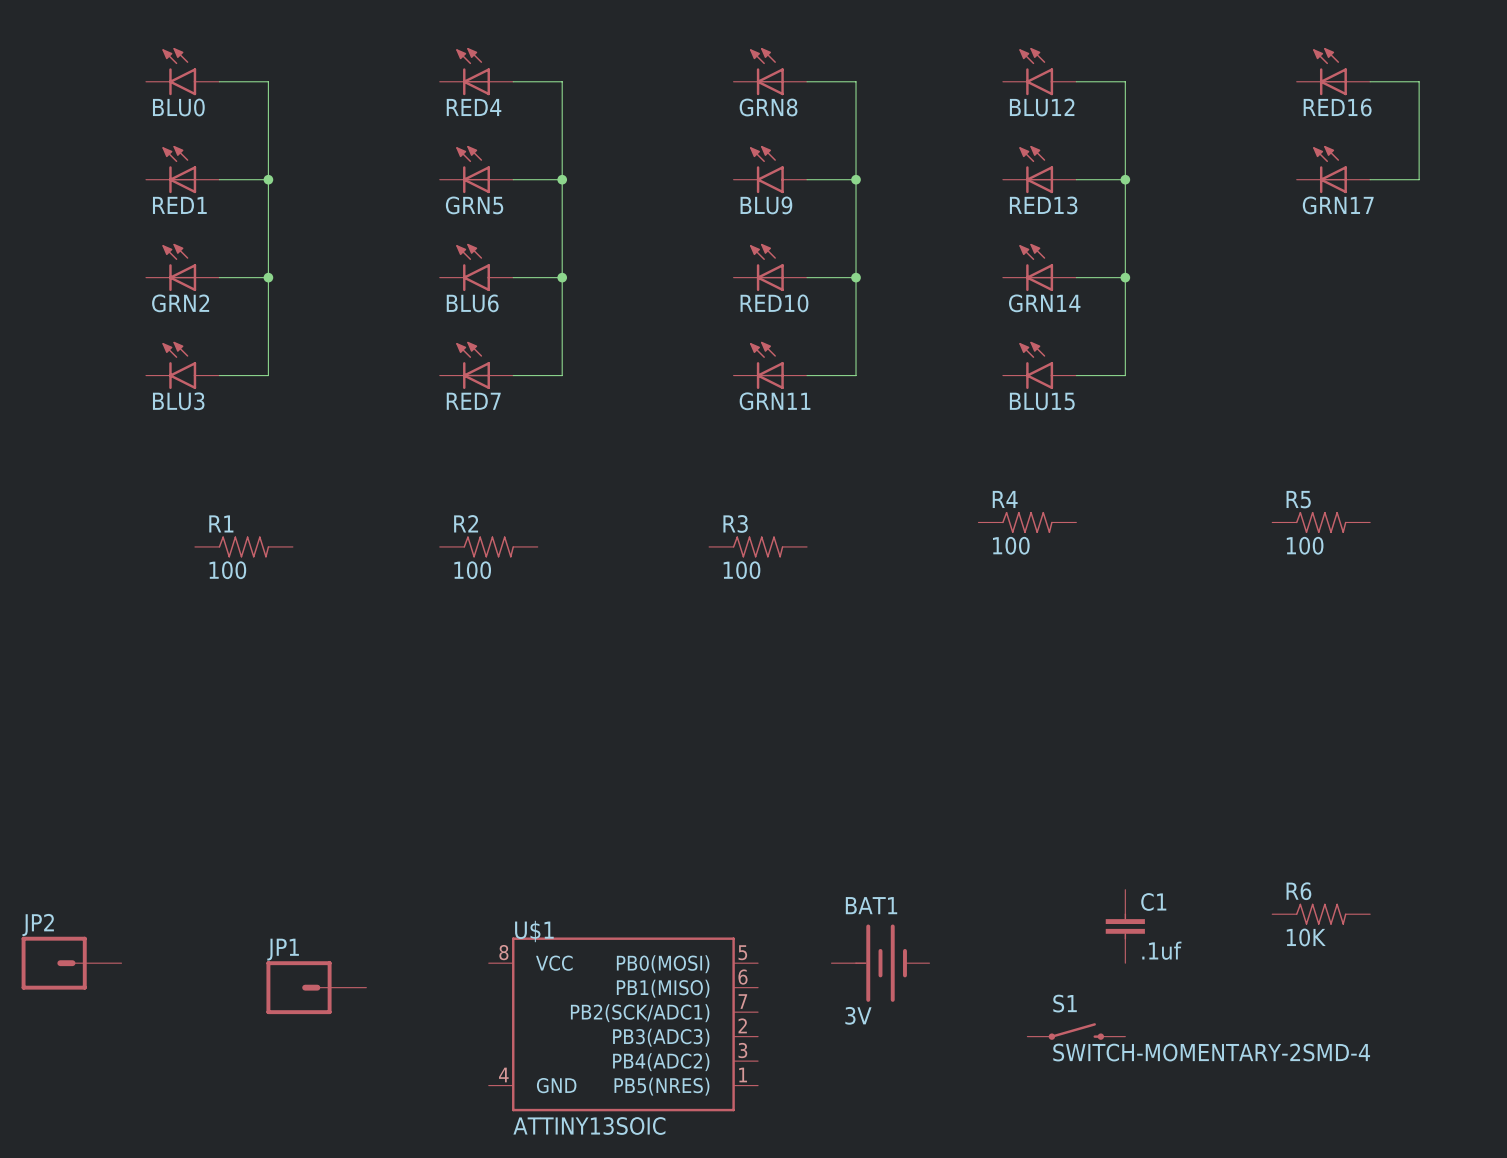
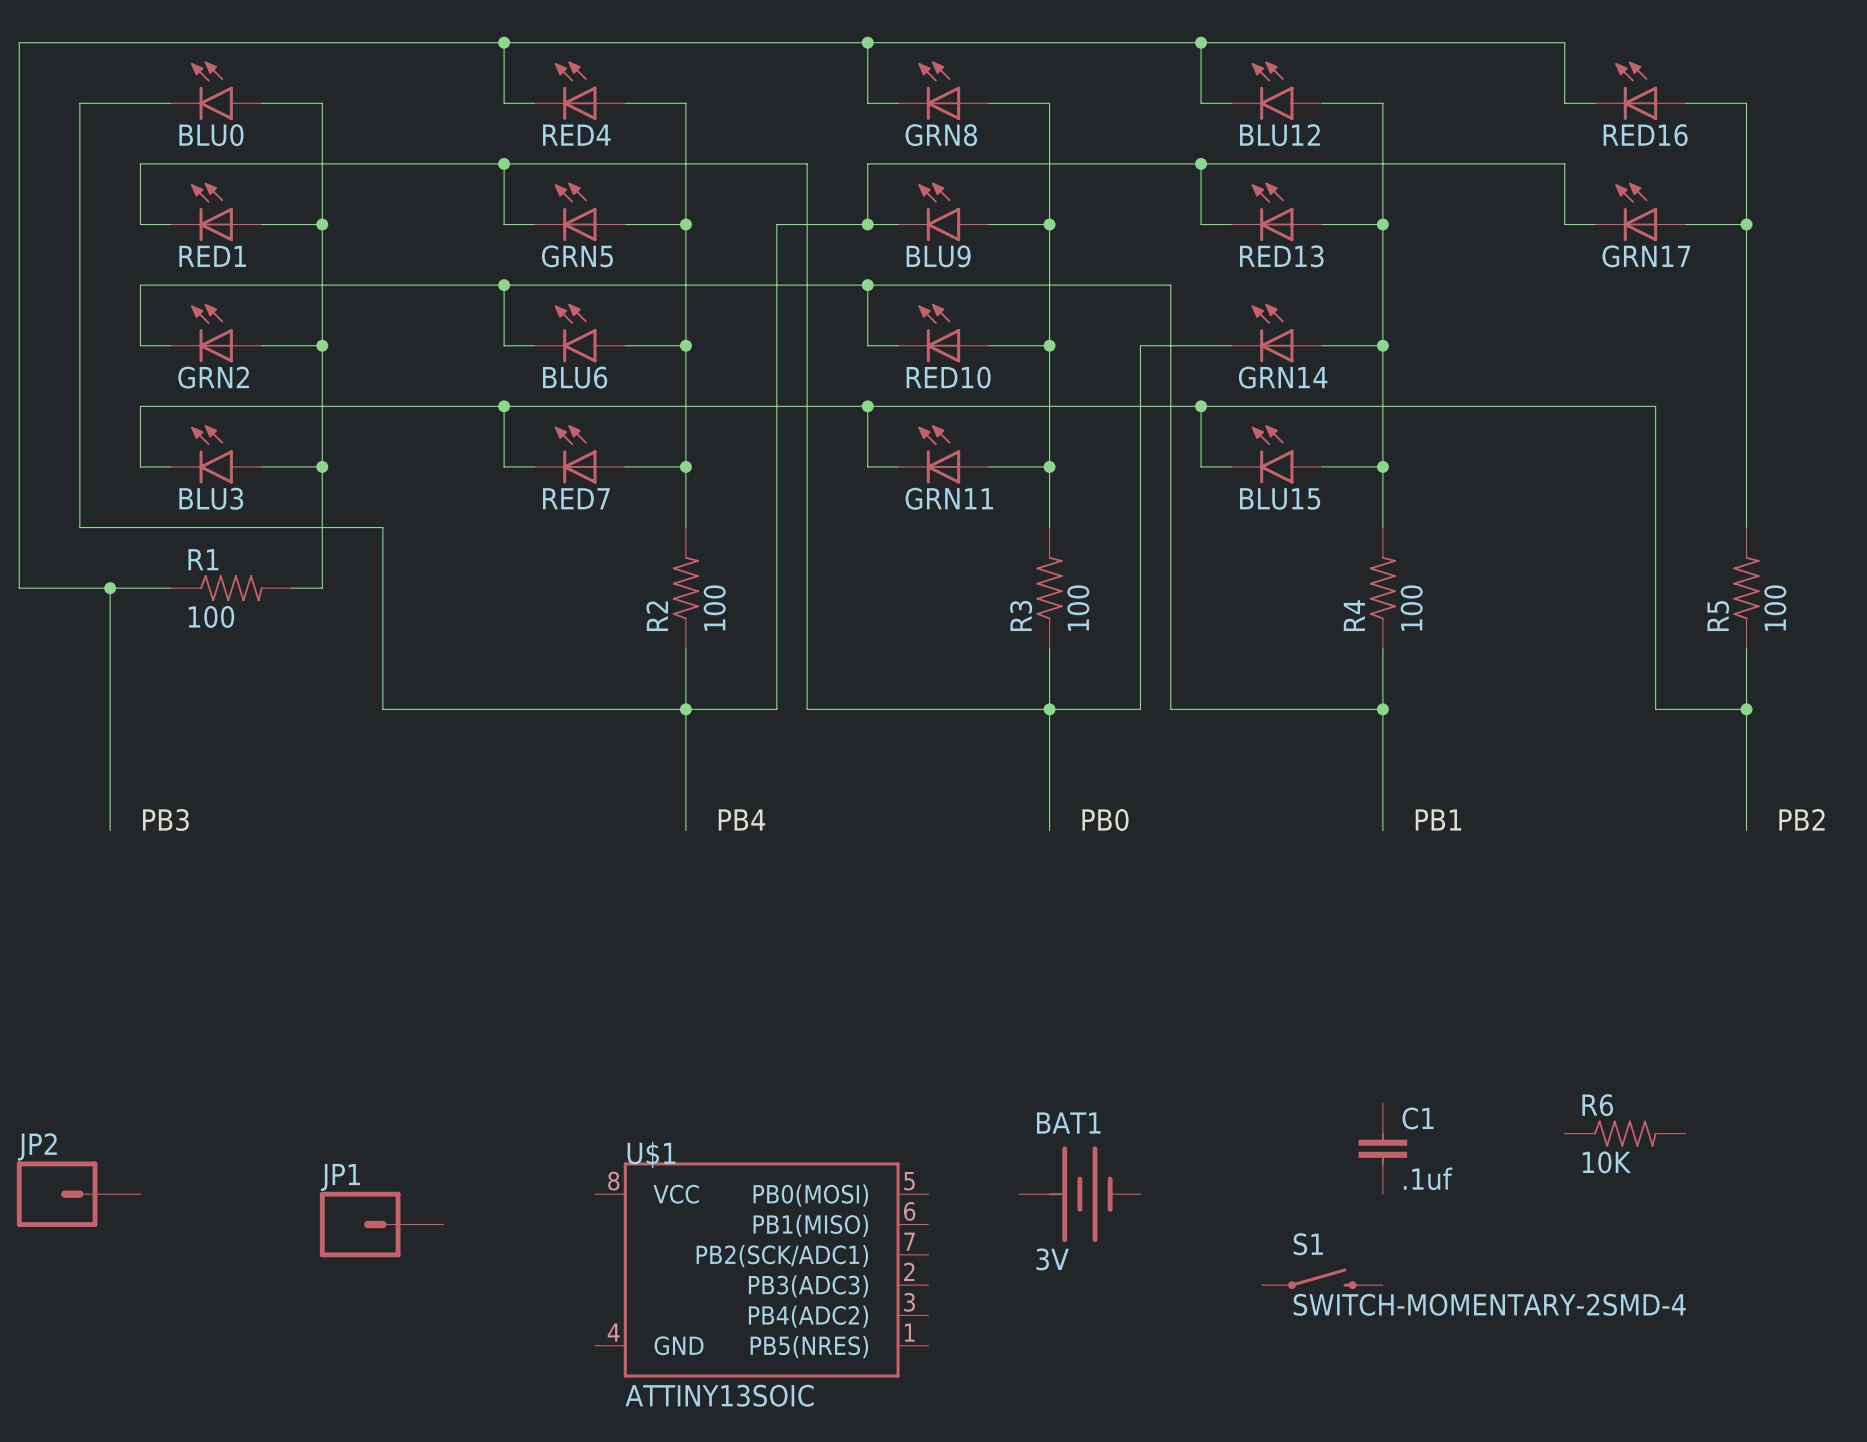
wire: none -> (504, 42) (504, 103) (534, 103)
junction: none -> (504, 42)
wire: none -> (867, 42) (867, 103) (898, 103)
junction: none -> (867, 42)
wire: none -> (1201, 42) (1201, 103) (1231, 103)
junction: none -> (1201, 42)
wire: none -> (170, 103) (79, 103) (79, 527) (382, 527) (382, 709) (776, 709) (776, 224) (898, 224)
wire: none -> (1595, 103) (1564, 103) (1564, 42) (19, 42) (19, 588) (170, 588)
wire: none -> (504, 163) (504, 224) (534, 224)
junction: none -> (504, 163)
wire: none -> (1201, 163) (1201, 224) (1231, 224)
junction: none -> (1201, 163)
wire: none -> (170, 224) (140, 224) (140, 163) (807, 163) (807, 709) (1140, 709) (1140, 345) (1231, 345)
wire: none -> (867, 224) (867, 163) (1564, 163) (1564, 224) (1595, 224)
junction: none -> (867, 224)
wire: none -> (1746, 224) (1746, 527)
junction: none -> (1746, 224)
wire: none -> (504, 285) (504, 345) (534, 345)
junction: none -> (504, 285)
wire: none -> (867, 285) (867, 345) (898, 345)
junction: none -> (867, 285)
wire: none -> (170, 345) (140, 345) (140, 285) (1170, 285) (1170, 709) (1382, 709)
wire: none -> (504, 406) (504, 466) (534, 466)
junction: none -> (504, 406)
wire: none -> (867, 406) (867, 466) (898, 466)
junction: none -> (867, 406)
wire: none -> (1201, 406) (1201, 466) (1231, 466)
junction: none -> (1201, 406)
wire: none -> (170, 466) (140, 466) (140, 406) (1655, 406) (1655, 709) (1746, 709)
wire: none -> (322, 466) (322, 588) (291, 588)
junction: none -> (322, 466)
wire: none -> (685, 466) (685, 527)
junction: none -> (685, 466)
wire: none -> (1049, 466) (1049, 527)
junction: none -> (1049, 466)
wire: none -> (1382, 466) (1382, 527)
junction: none -> (1382, 466)
wire: none -> (110, 588) (110, 830)
junction: none -> (110, 588)
wire: none -> (685, 648) (685, 830)
wire: none -> (1049, 648) (1049, 830)
R4 rotation: 0° (1027, 522) -> 90° counterclockwise (1382, 588)
R4 position: (1027, 522) -> (1382, 588)
wire: none -> (1382, 648) (1382, 830)
R5 rotation: 0° (1321, 522) -> 90° counterclockwise (1746, 588)
R5 position: (1321, 522) -> (1746, 588)
wire: none -> (1746, 648) (1746, 830)
R1 position: (243, 546) -> (231, 588)
R2 rotation: 0° (488, 546) -> 90° counterclockwise (685, 588)
R2 position: (488, 546) -> (685, 588)
R3 rotation: 0° (758, 546) -> 90° counterclockwise (1049, 588)
R3 position: (758, 546) -> (1049, 588)
junction: none -> (685, 709)
junction: none -> (1049, 709)
junction: none -> (1382, 709)
junction: none -> (1746, 709)
label: none -> PB3 (165, 819)
label: none -> PB4 (741, 819)
label: none -> PB0 (1105, 819)
label: none -> PB1 (1438, 819)
label: none -> PB2 (1802, 819)

